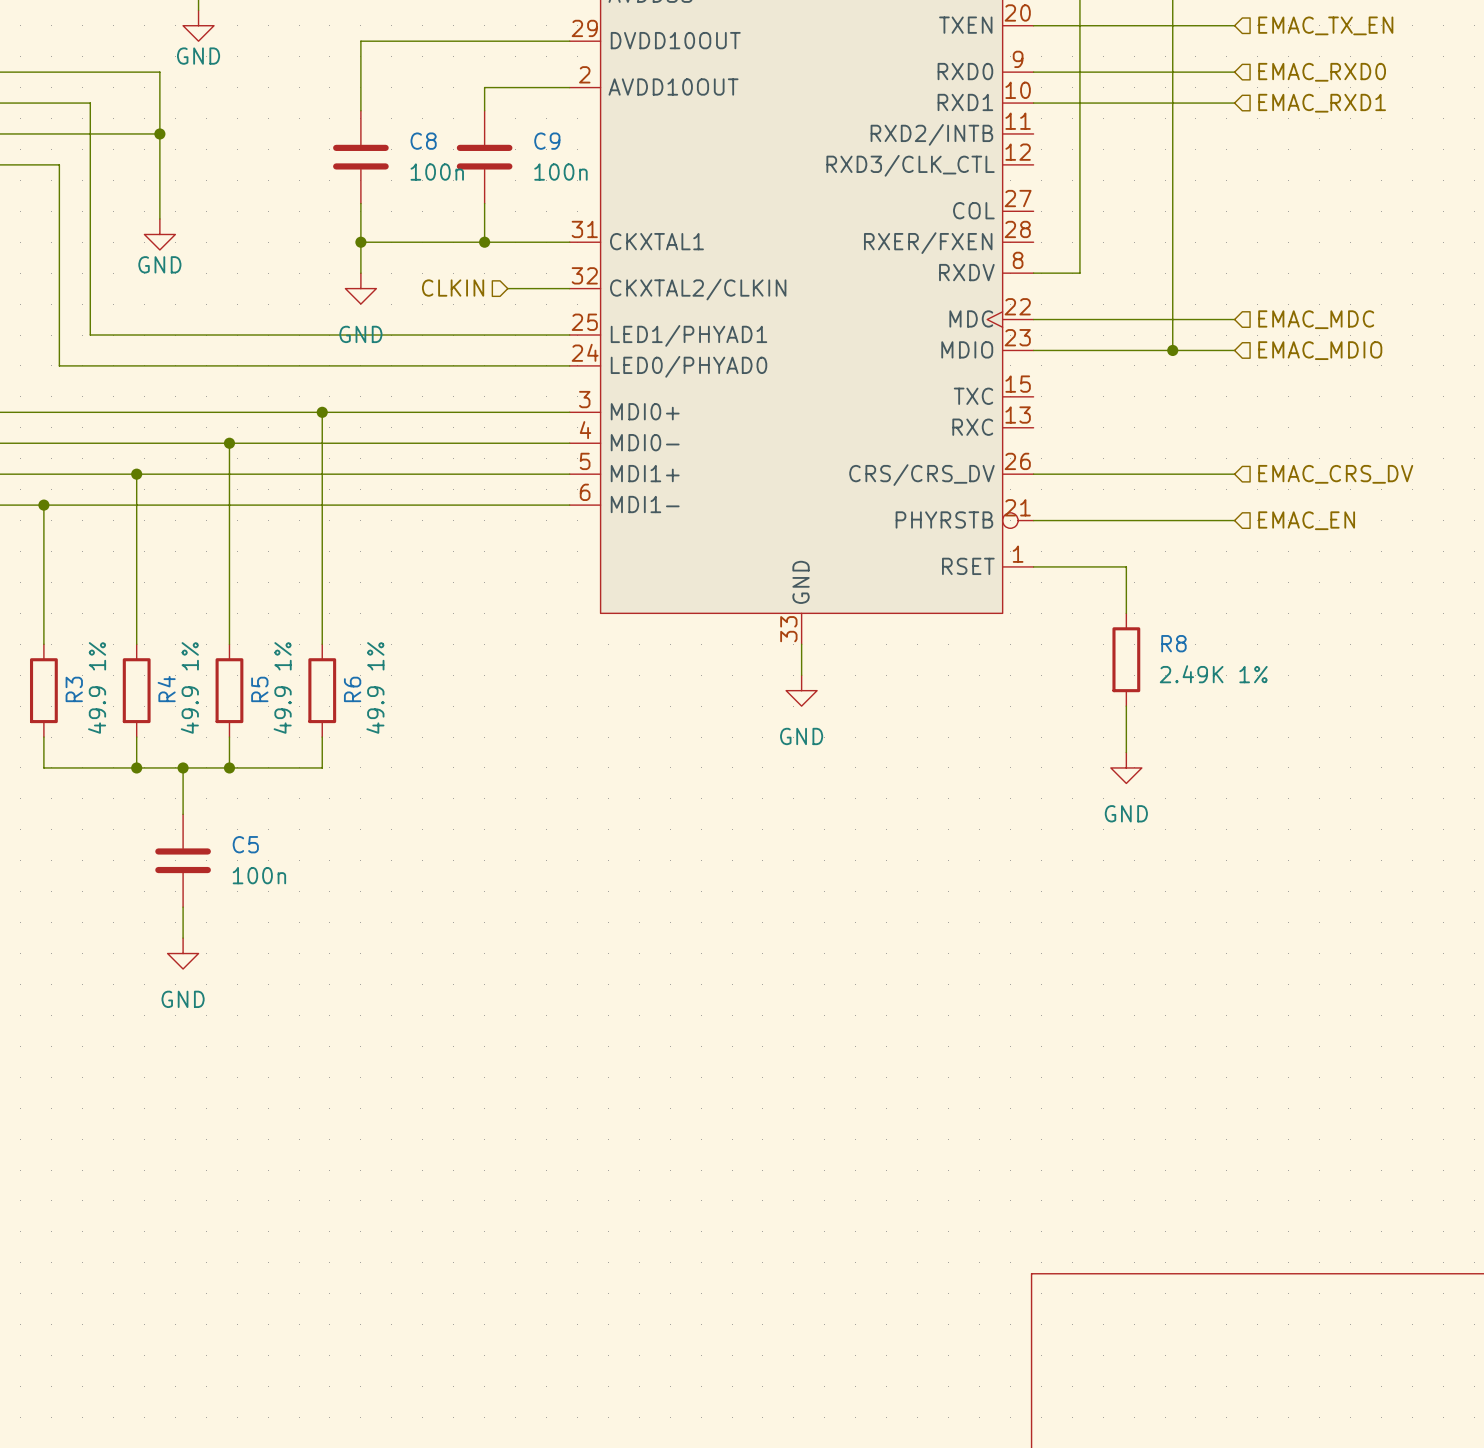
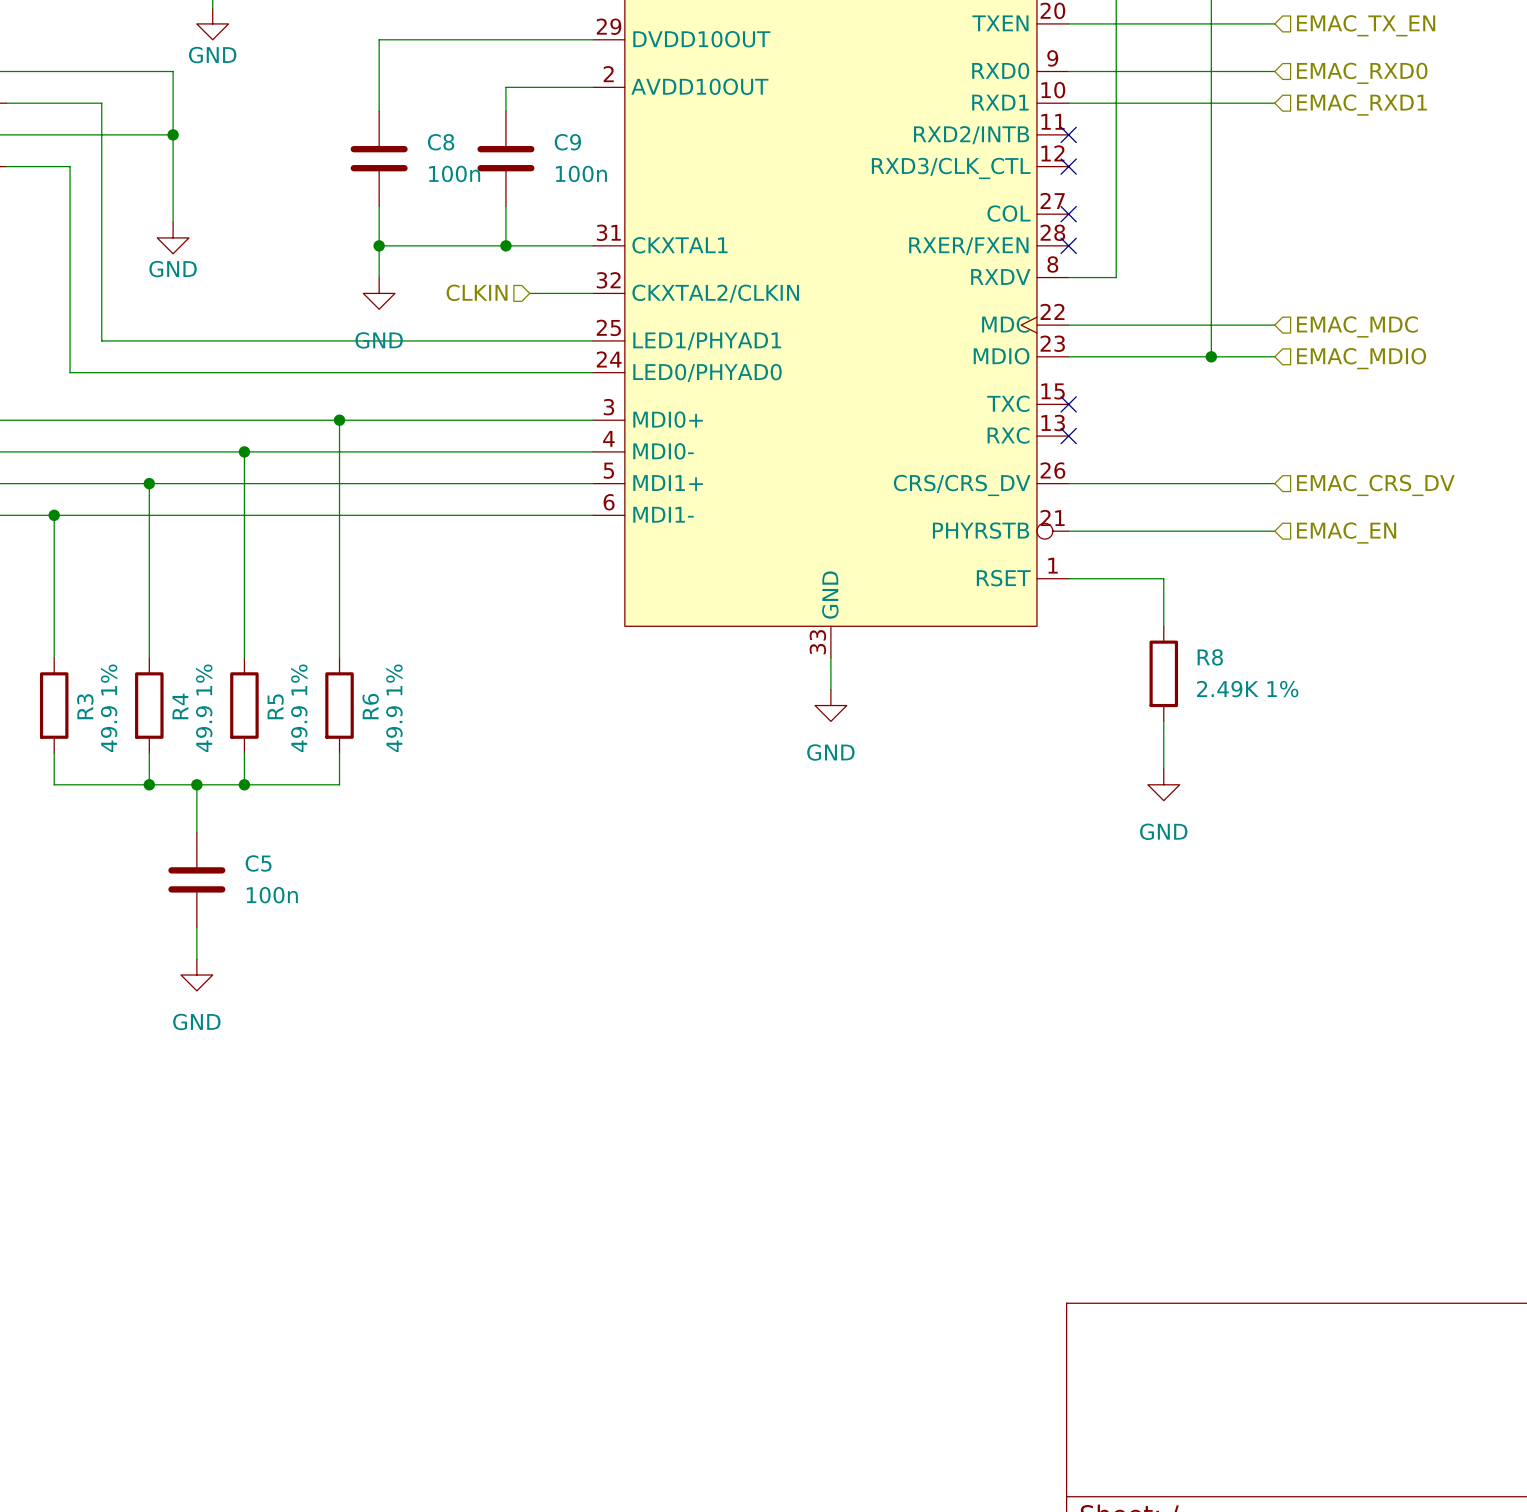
no-connect mark: none -> (1068, 134)
no-connect mark: none -> (1068, 166)
no-connect mark: none -> (1068, 214)
no-connect mark: none -> (1068, 245)
no-connect mark: none -> (1068, 404)
no-connect mark: none -> (1068, 436)

